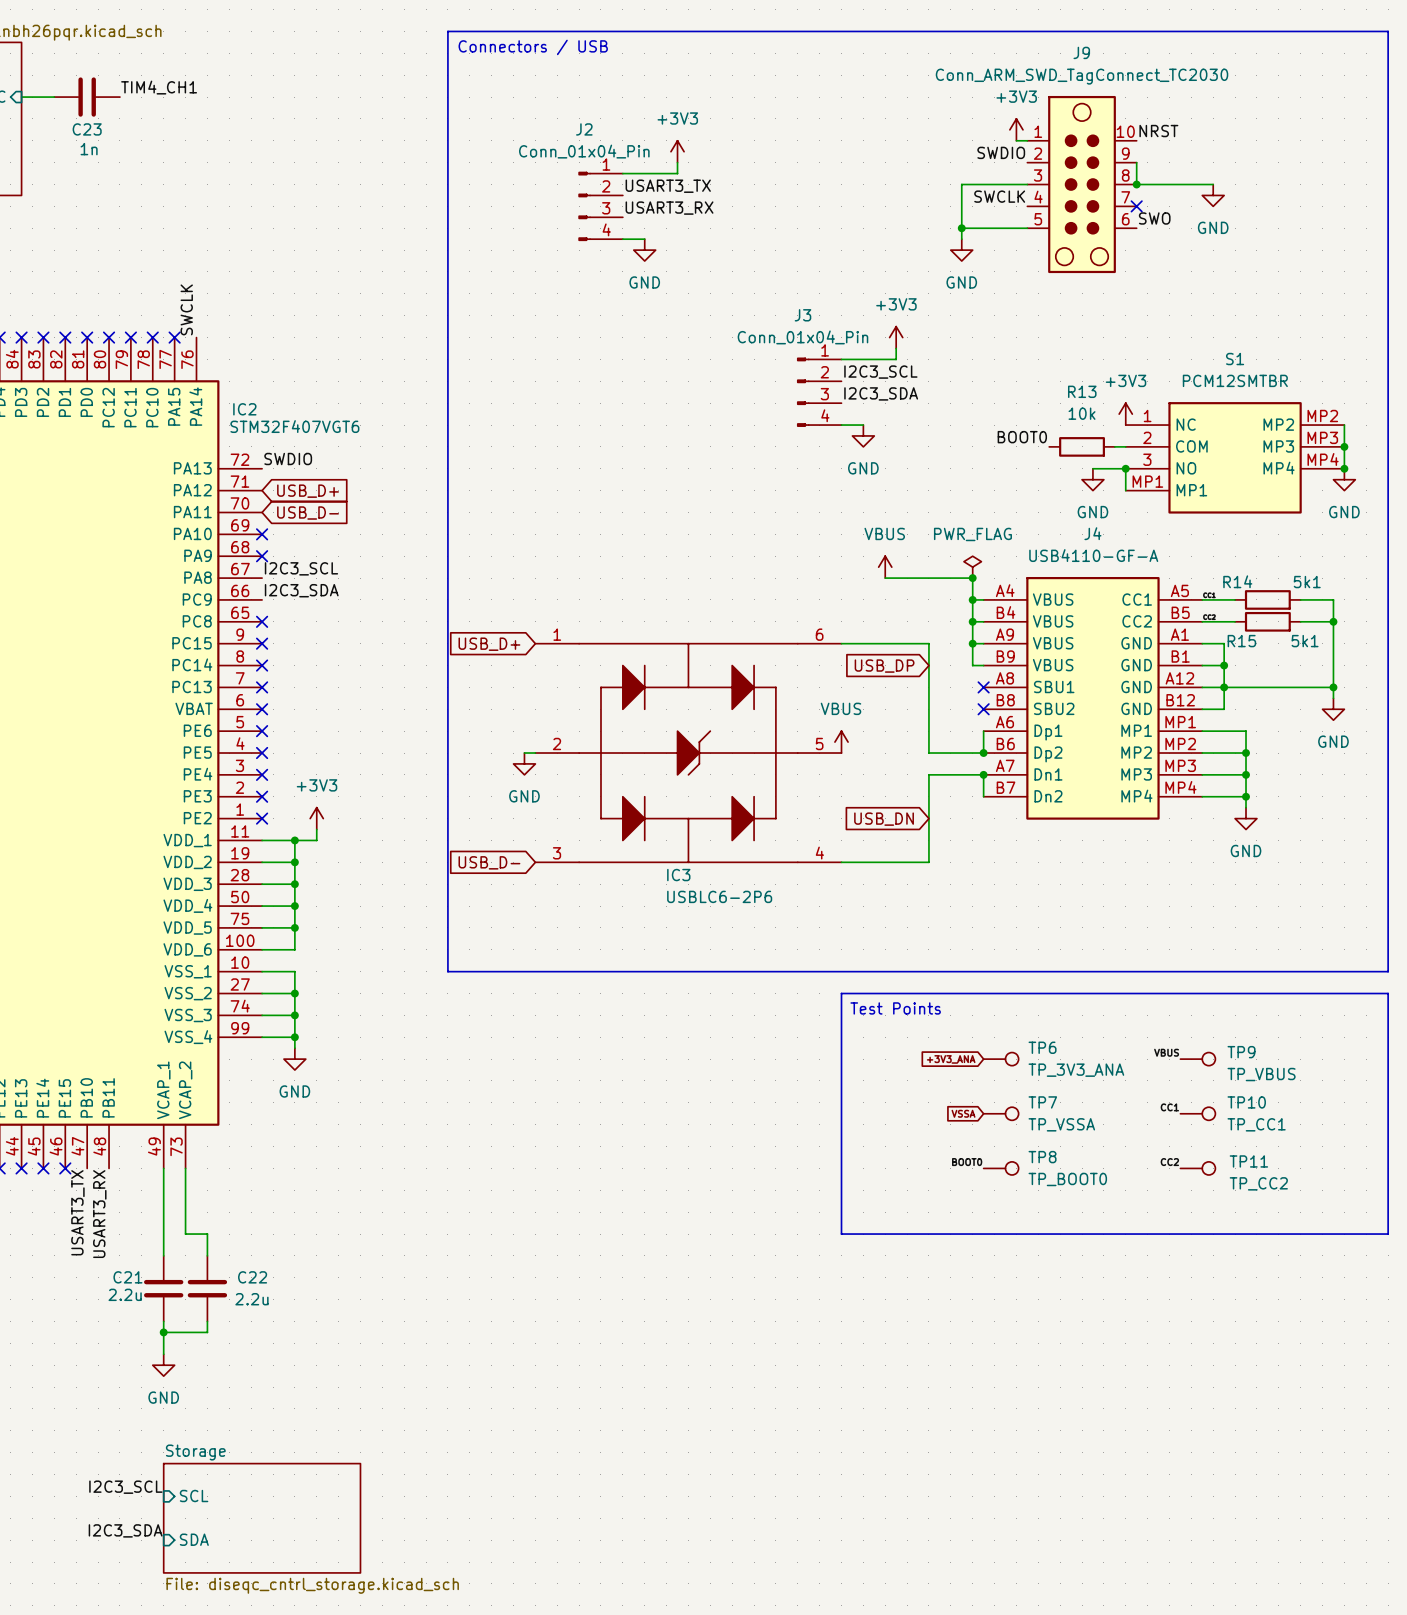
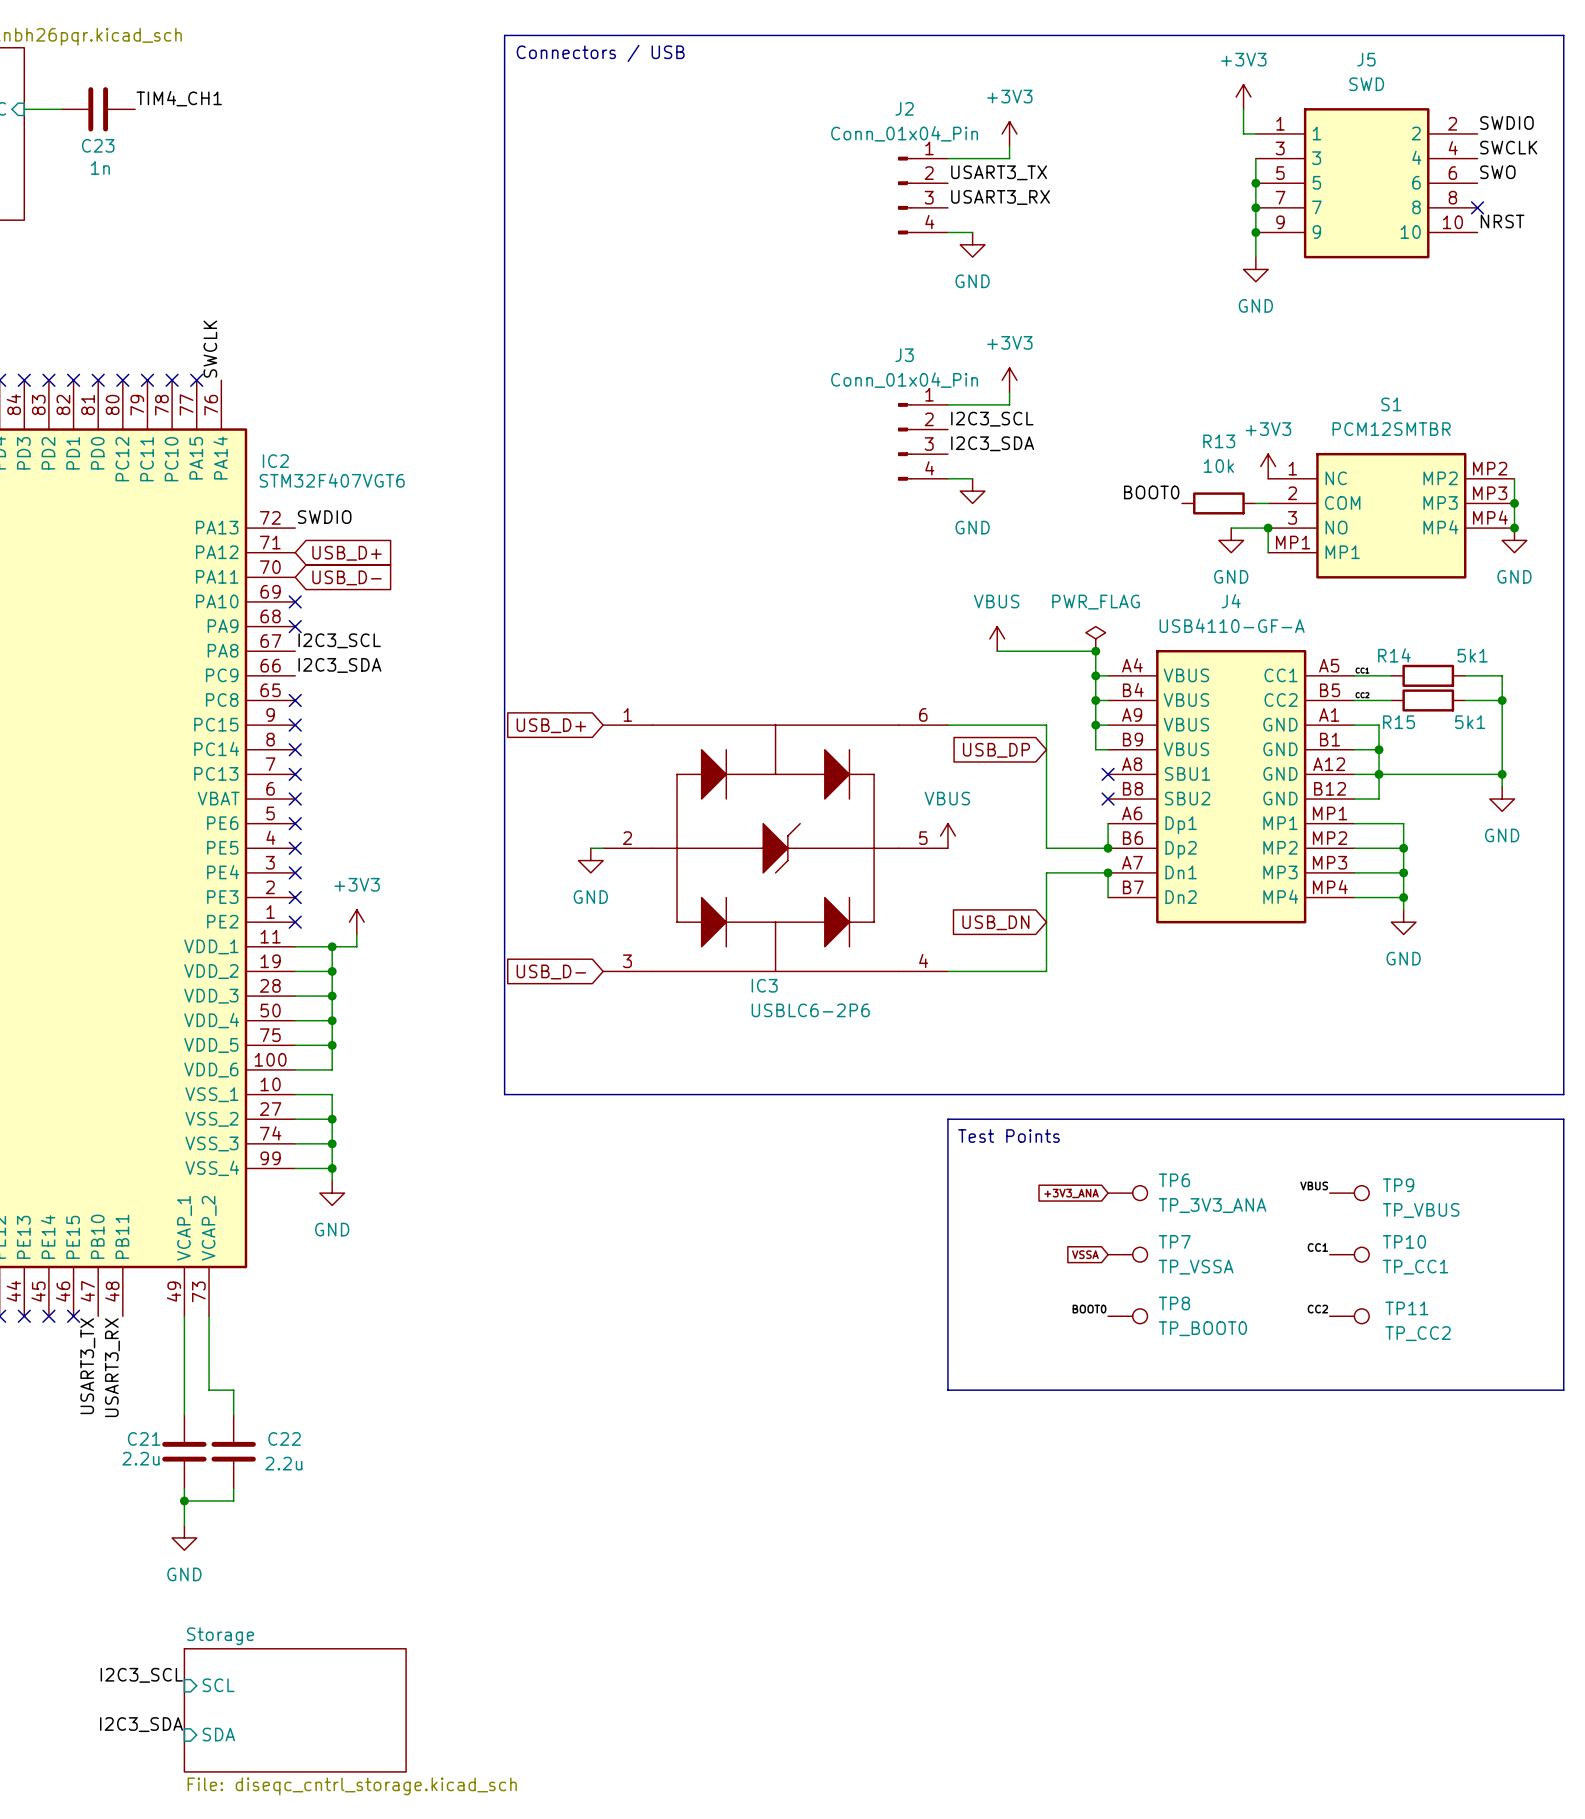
power symbol: none -> +3V3 (1243, 97)
label: none -> SWDIO (1506, 122)
power symbol: none -> +3V3 (1009, 133)
wire: none -> (1009, 146) (1009, 158) (947, 158)
power symbol: +3V3 (1016, 129) -> none
label position: NRST (1158, 131) -> NRST (1502, 221)
label: none -> SWCLK (1508, 147)
wire: (1016, 140) (1027, 140) -> none
power symbol: +3V3 (677, 151) -> none
label: SWDIO (1001, 152) -> none
label: none -> USART3_TX (999, 172)
wire: (677, 162) (677, 173) (622, 173) -> none
junction: none -> (1255, 183)
J5: none -> SWD (1366, 183)
label: none -> USART3_RX (1000, 197)
wire: (1027, 184) (961, 184) (961, 239) -> none
J9: Conn_ARM_SWD_TagConnect_TC2030 (1082, 184) -> none
junction: none -> (1255, 207)
junction: (1136, 184) -> none
no-connect mark: none -> (1477, 207)
label: USART3_TX (668, 186) -> none
power symbol: GND (1213, 195) -> none
label: SWCLK (999, 196) -> none
J2 position: (600, 206) -> (922, 195)
wire: none -> (947, 232) (972, 232)
junction: none -> (1255, 232)
no-connect mark: (1136, 206) -> none
label: USART3_RX (669, 208) -> none
power symbol: none -> GND (972, 244)
label position: SWO (1154, 218) -> SWO (1497, 172)
wire: (961, 228) (1027, 228) -> none
junction: (961, 228) -> none
wire: (622, 239) (644, 239) -> none
power symbol: none -> GND (1255, 269)
power symbol: GND (644, 250) -> none
power symbol: GND (961, 250) -> none

